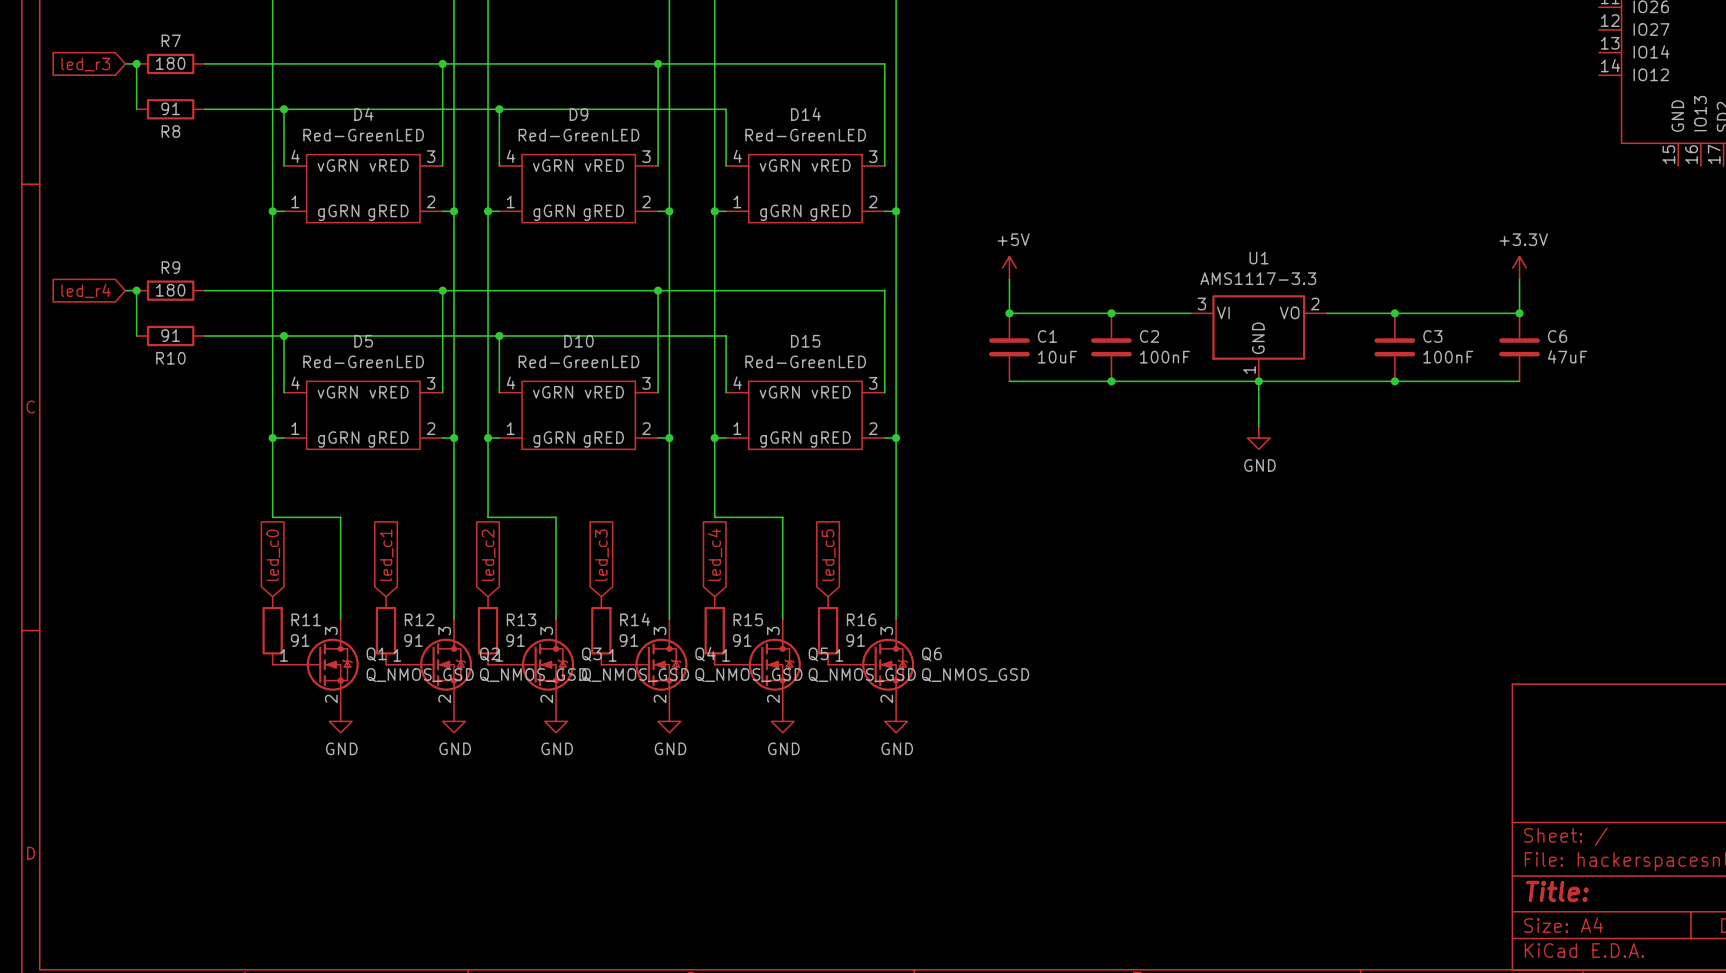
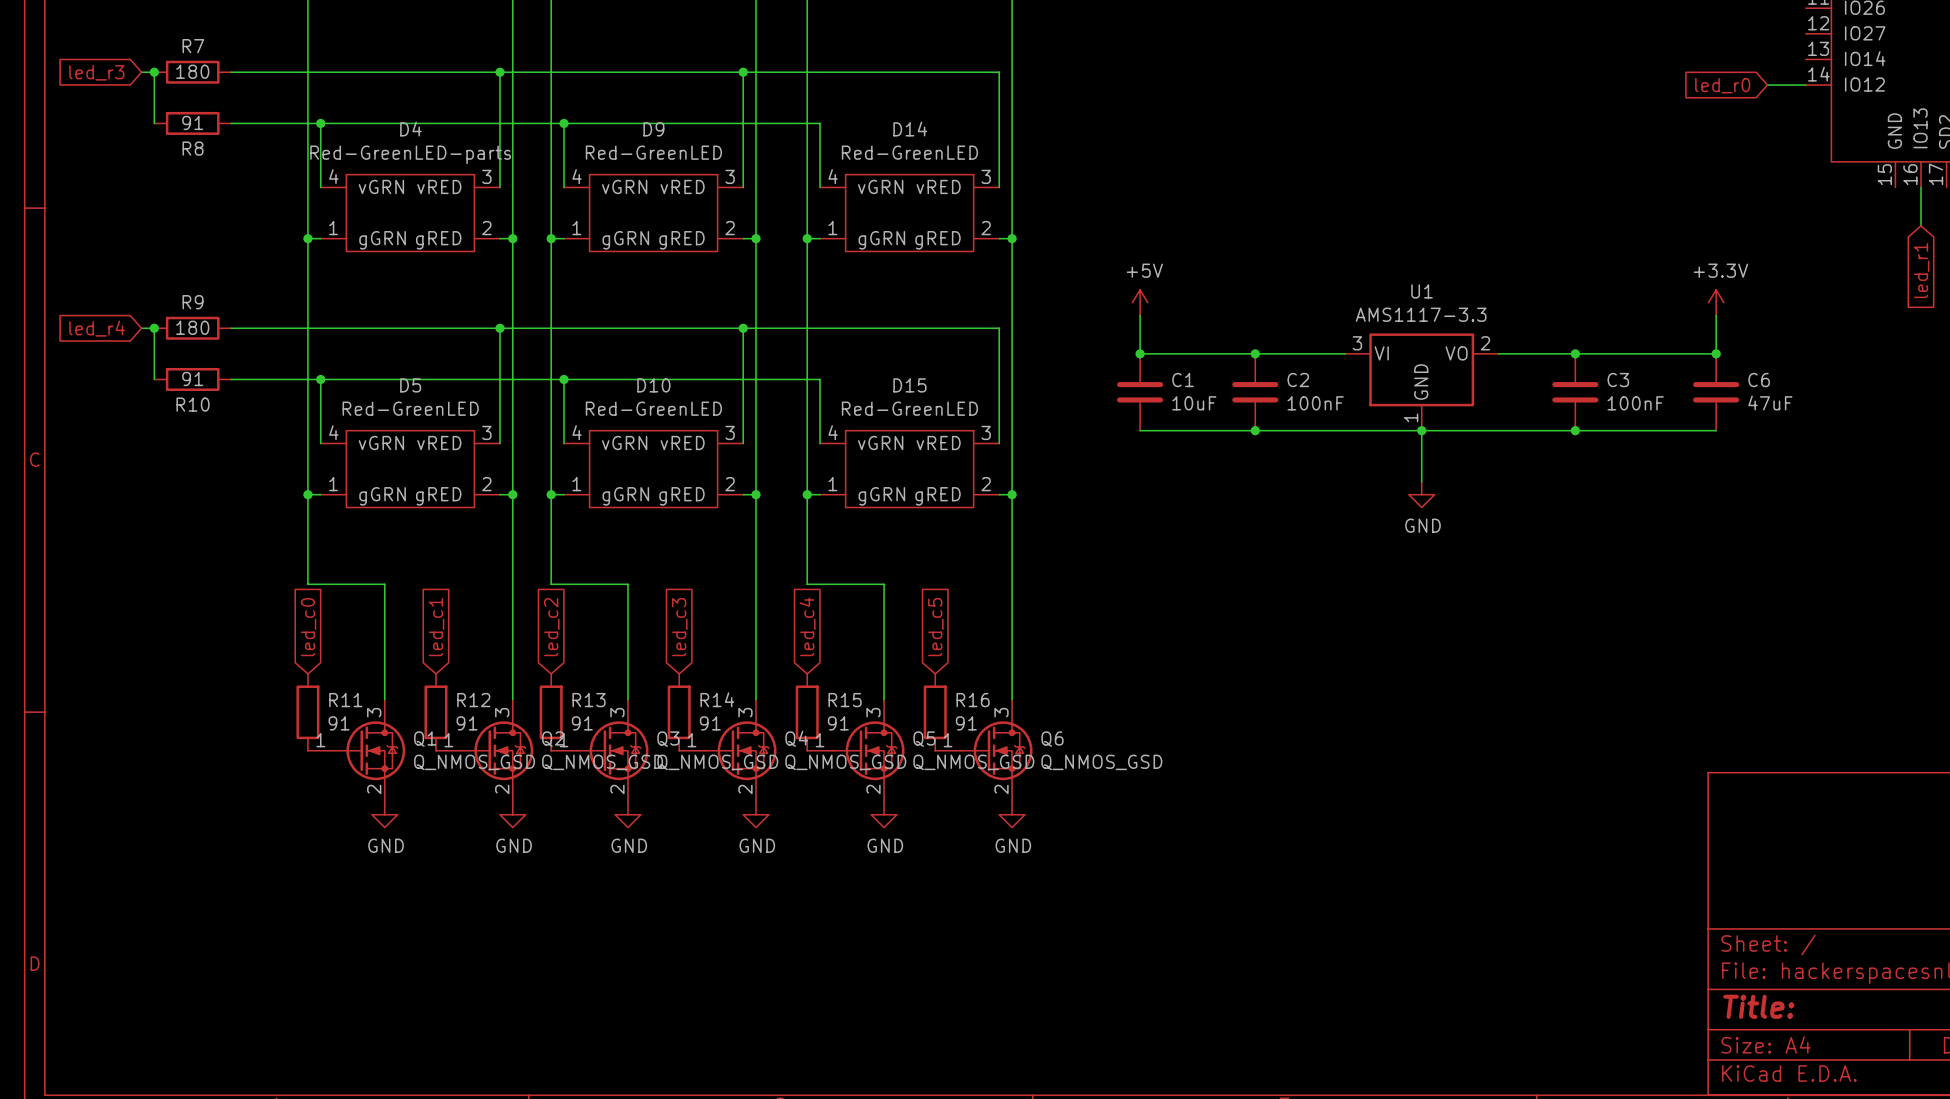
global label: none -> led_r0 (1722, 85)
wire: none -> (1767, 85) (1805, 85)
D4 value: Red-GreenLED (363, 135) -> Red-GreenLED-parts (410, 154)
wire: none -> (1921, 187) (1921, 225)
global label: none -> led_r1 (1921, 270)

